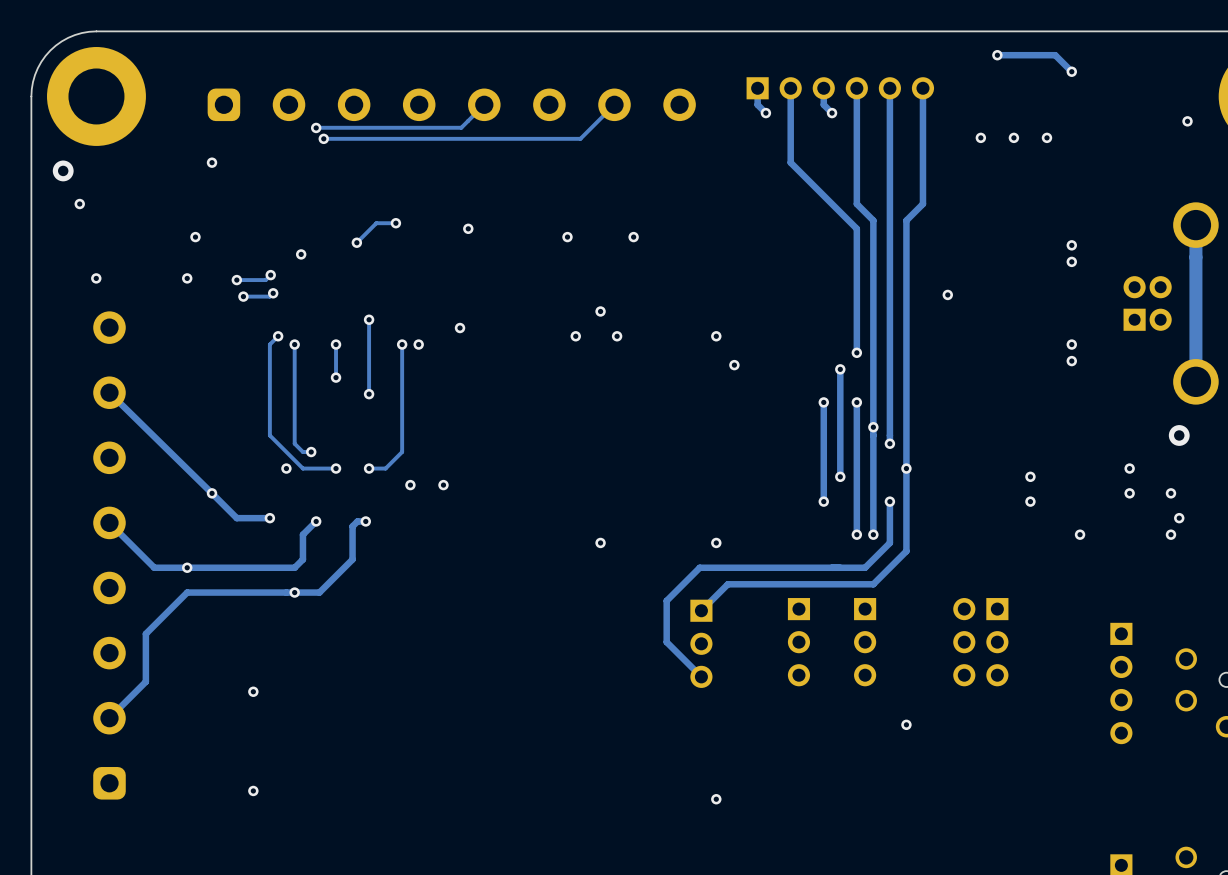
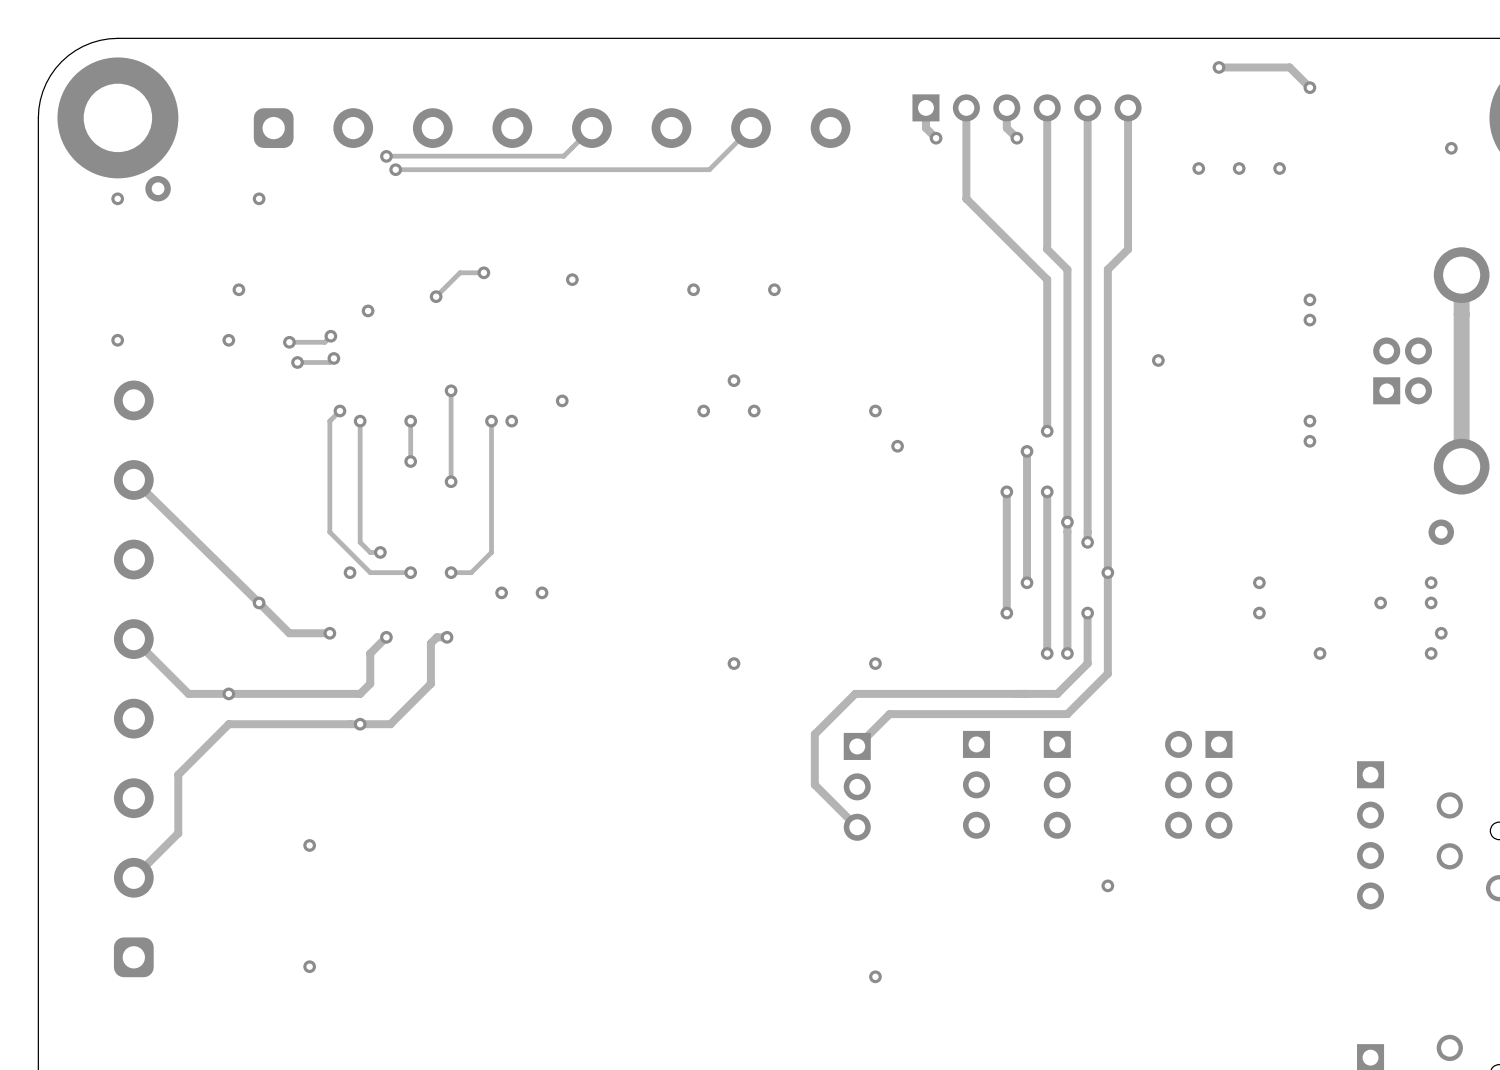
via position: (63, 170) -> (158, 188)
via position: (79, 204) -> (117, 198)
via position: (1129, 468) -> (1431, 582)

